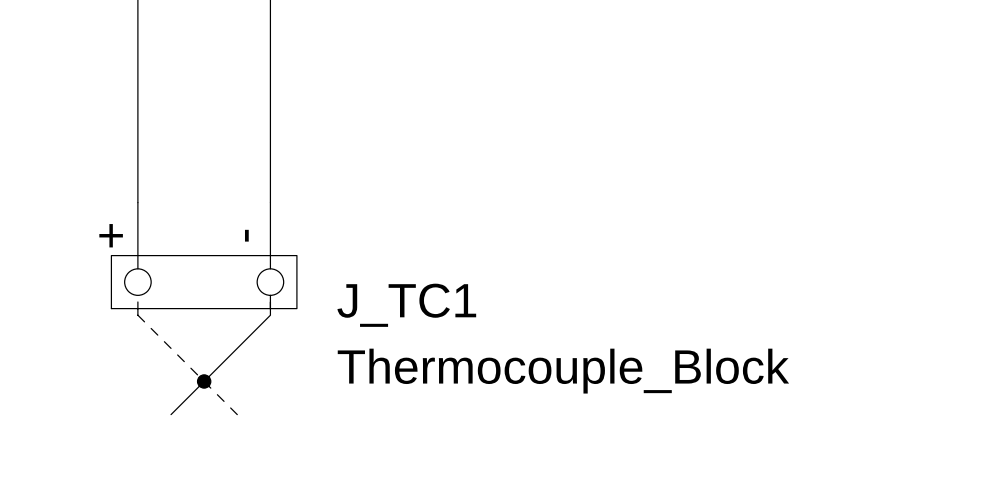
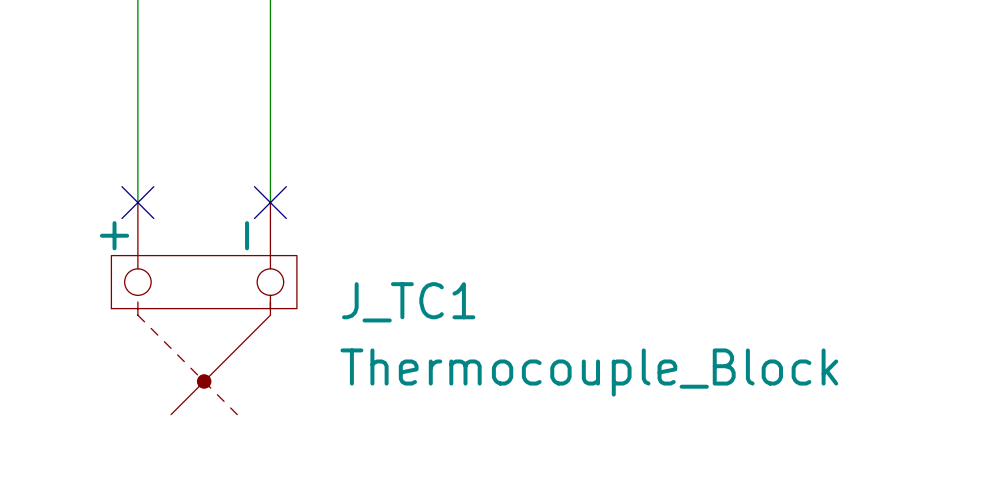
no-connect mark: none -> (137, 202)
no-connect mark: none -> (270, 202)

